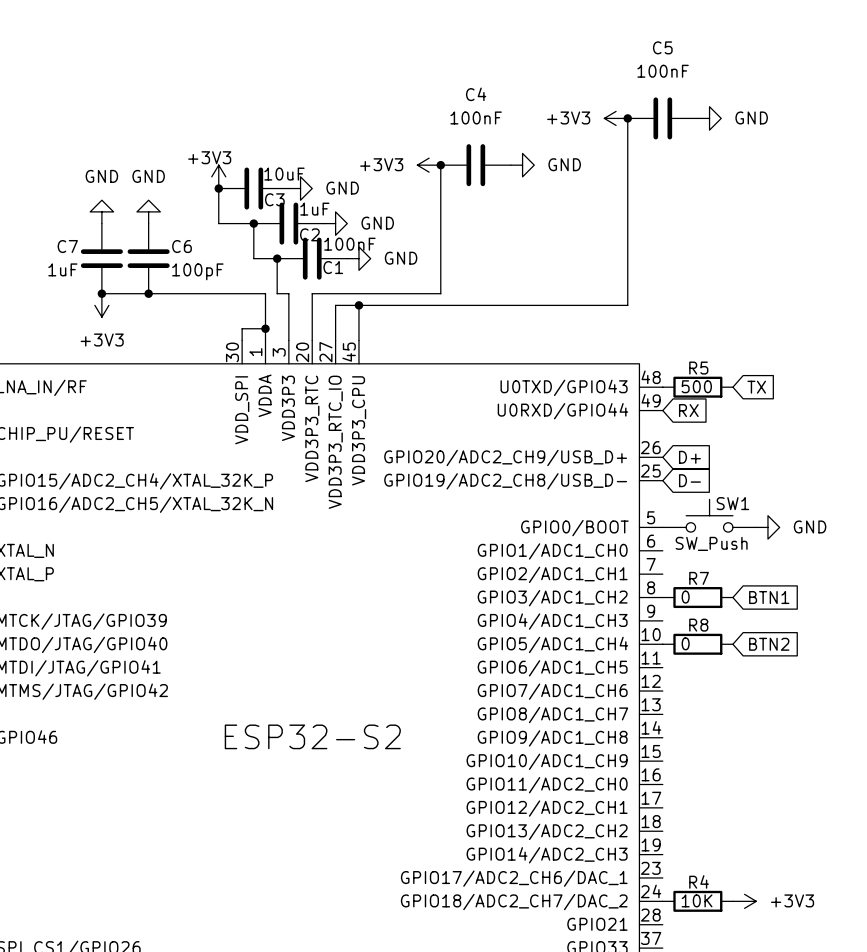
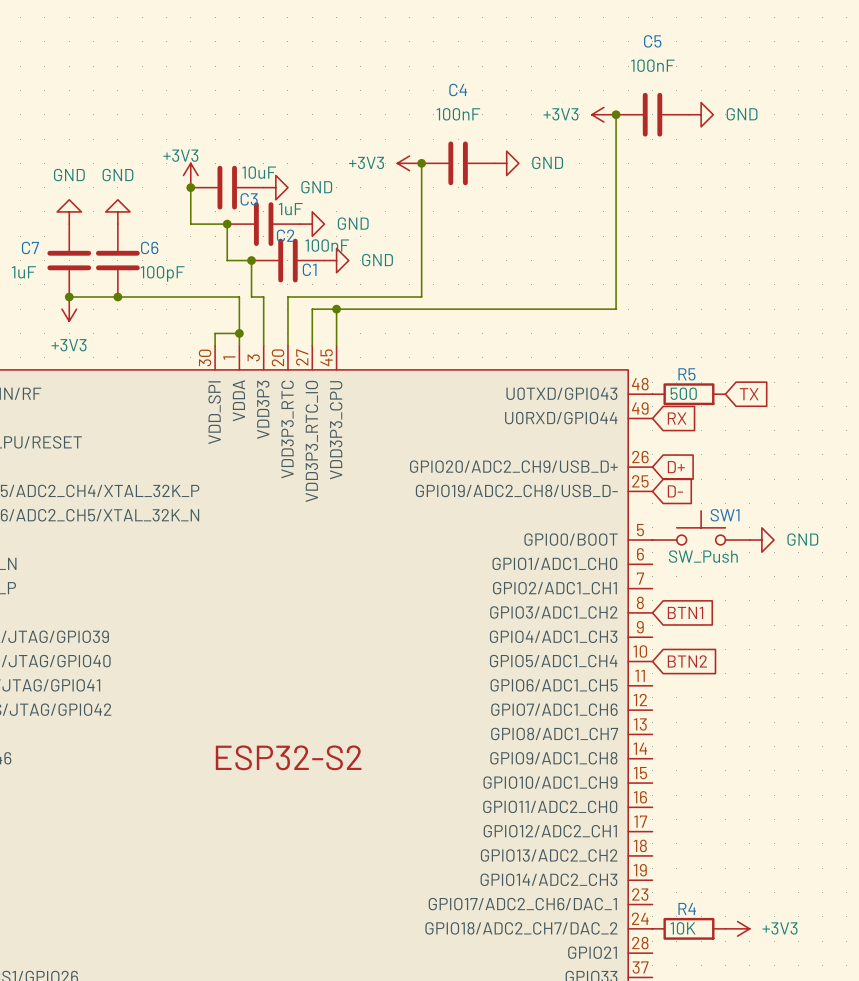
R7: 0 (697, 597) -> none
global label position: BTN1 (769, 597) -> BTN1 (685, 612)
R8: 0 (697, 644) -> none
global label position: BTN2 (769, 644) -> BTN2 (687, 661)

